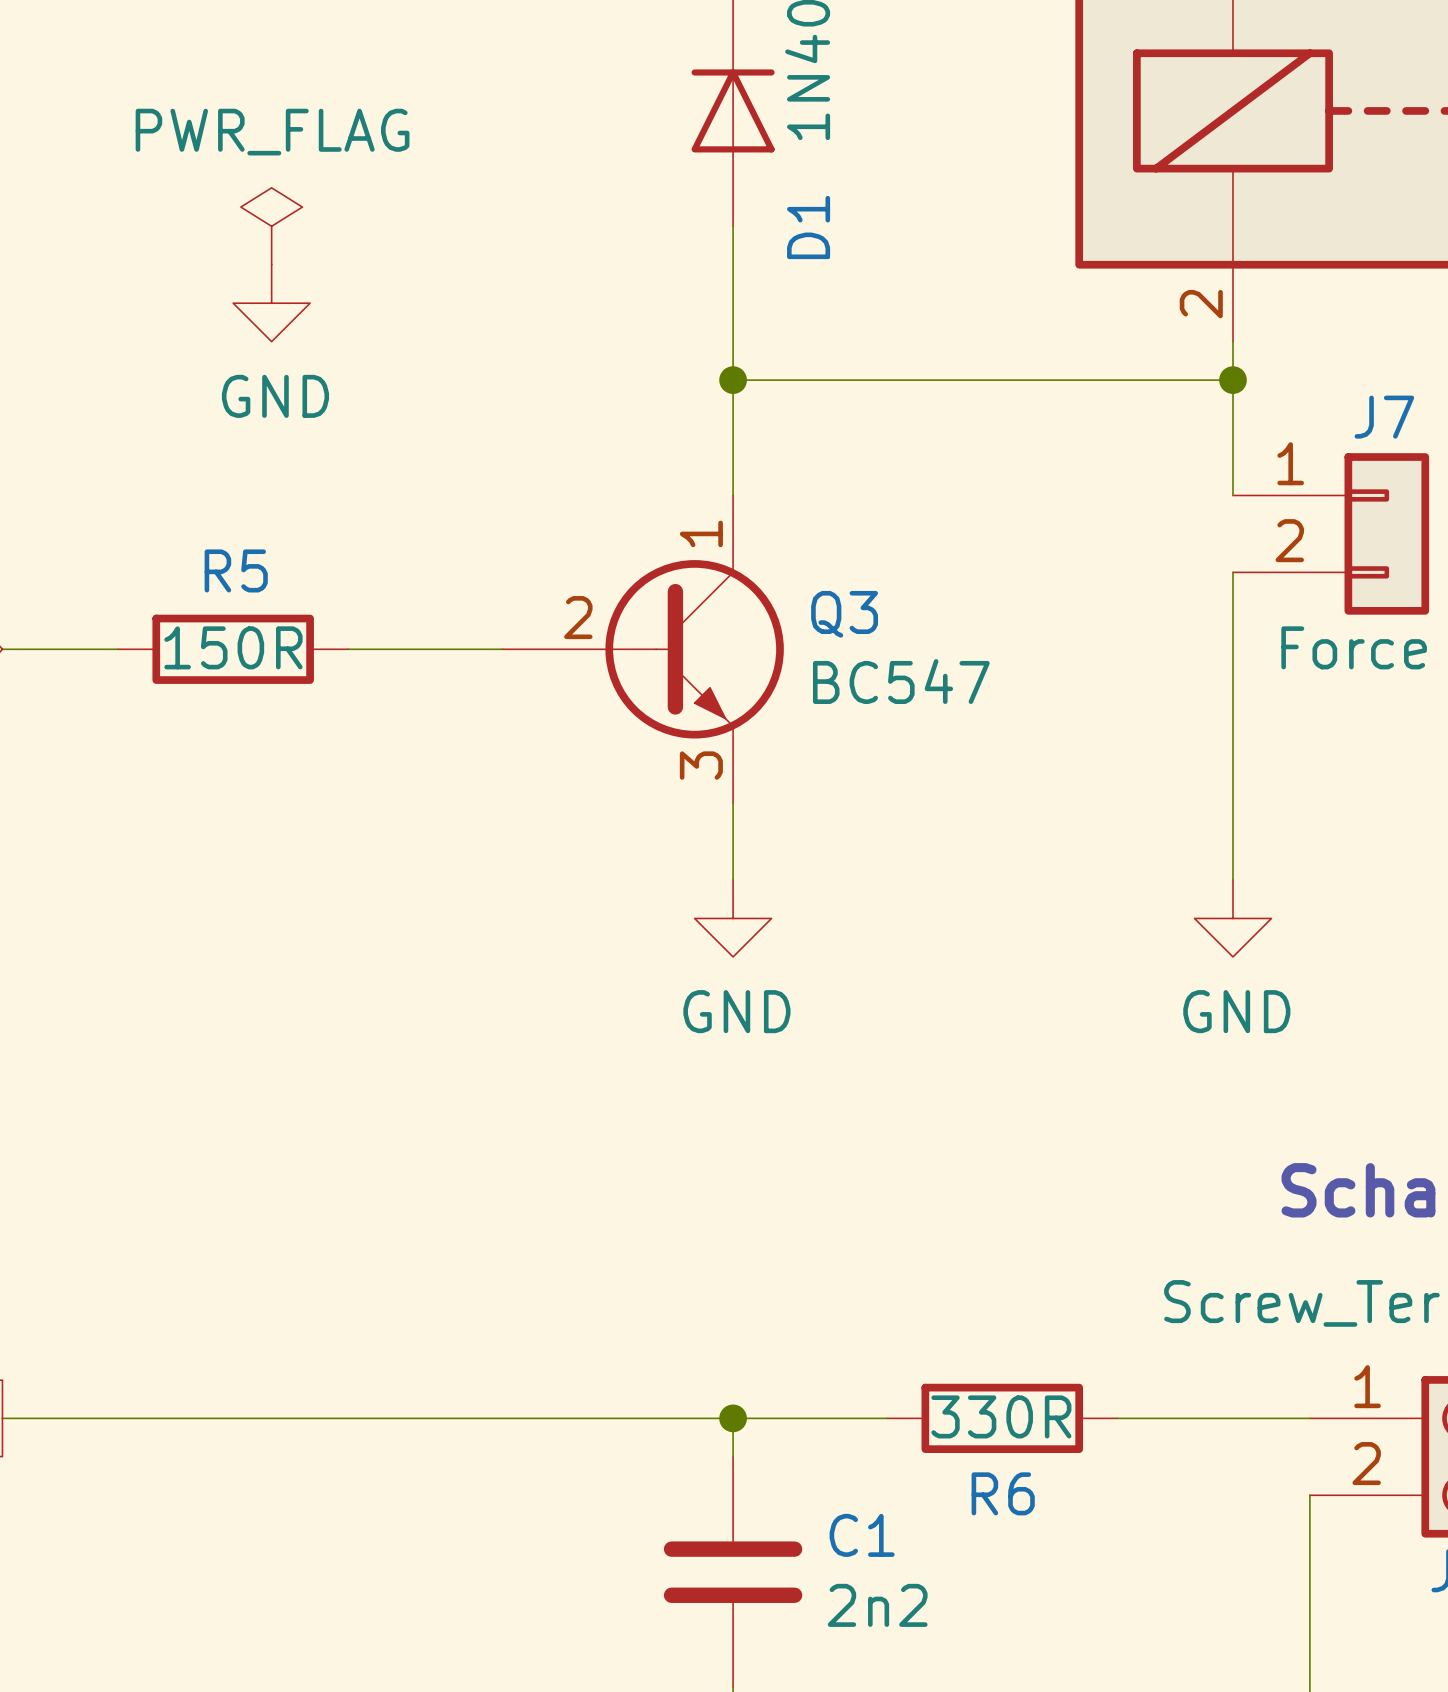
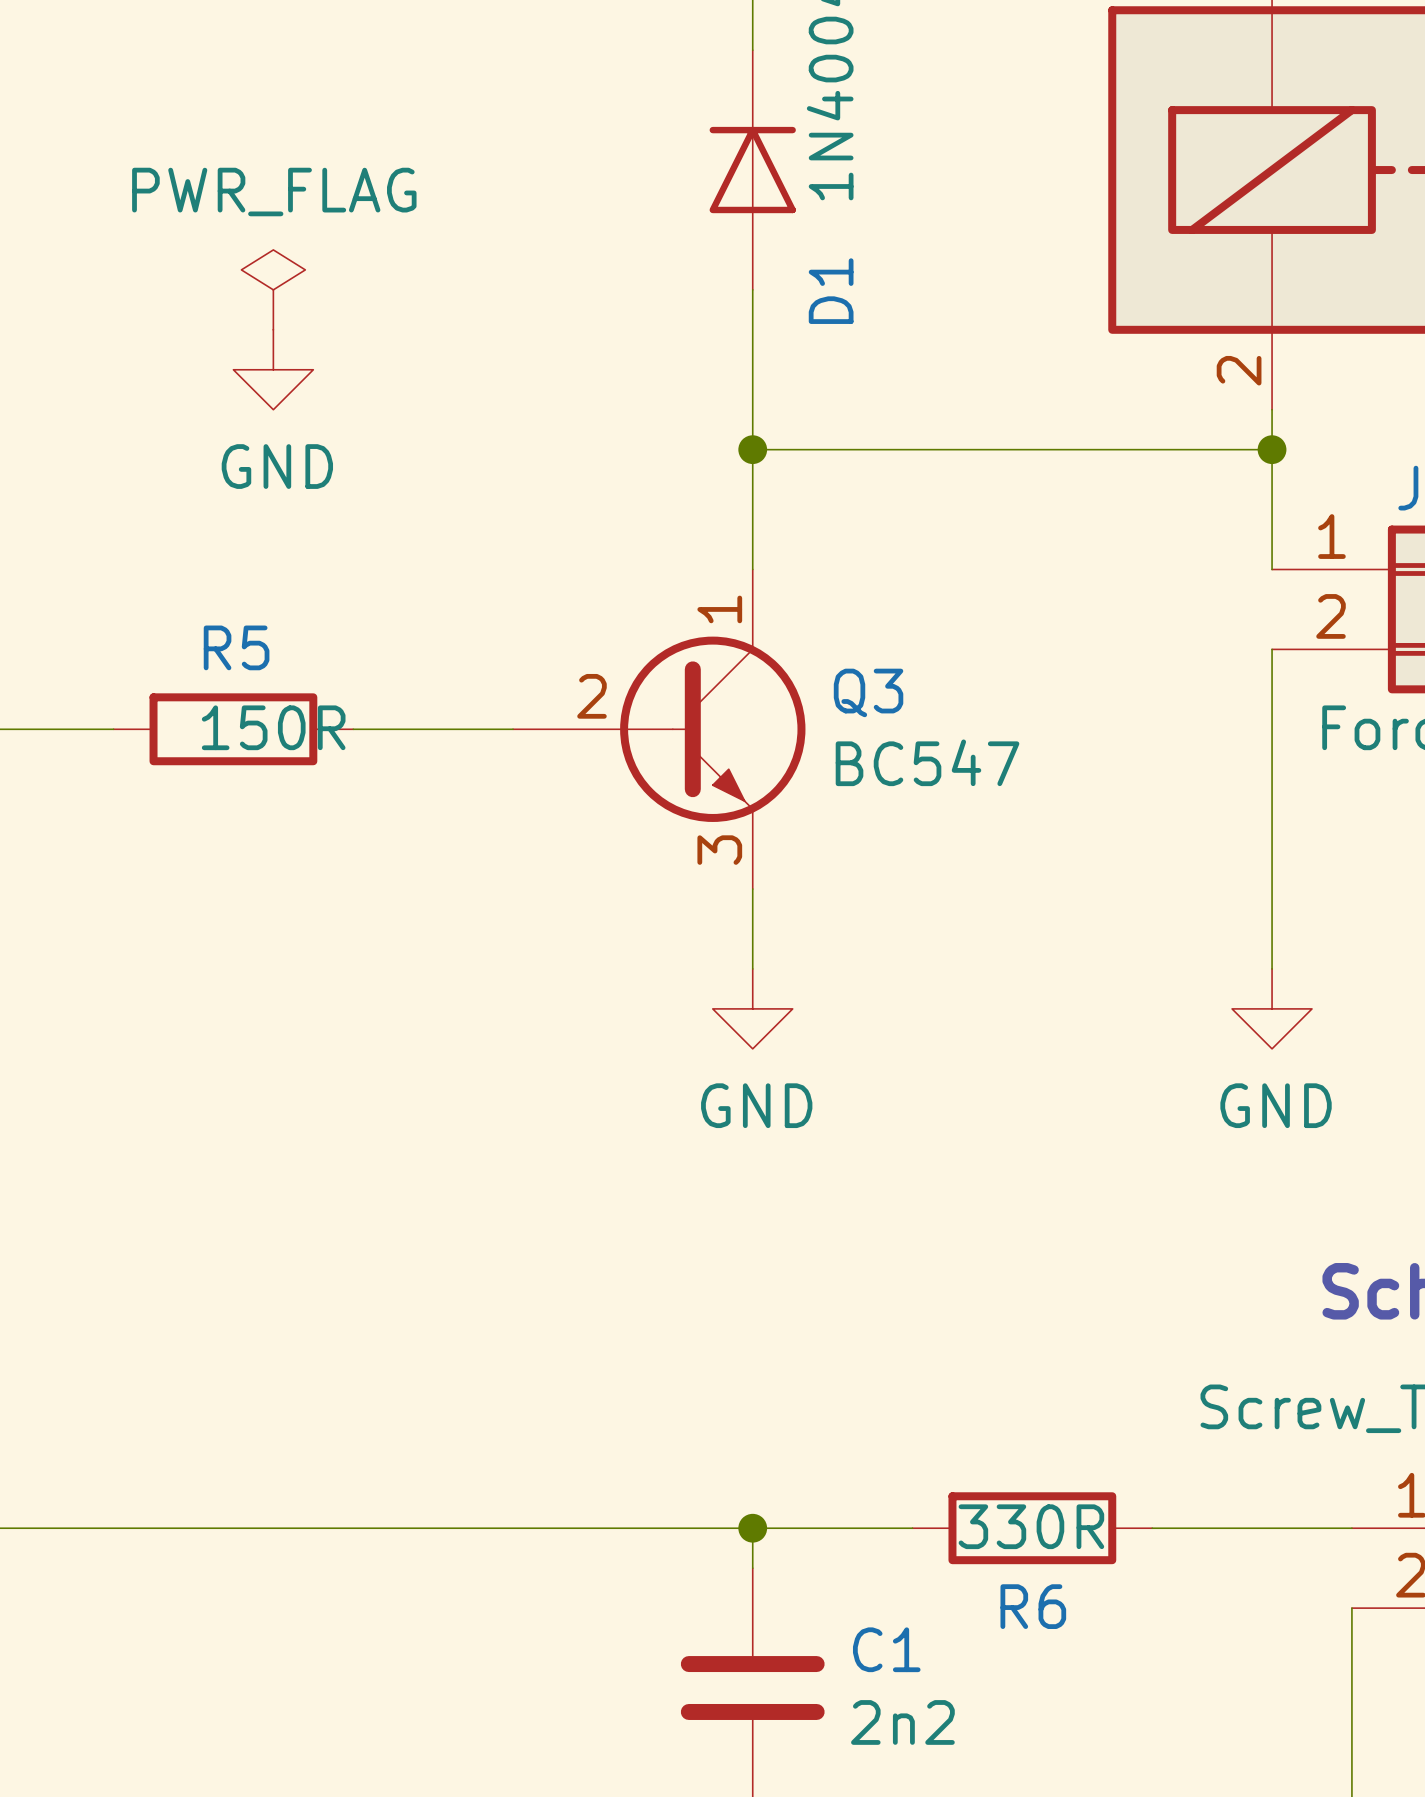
R5 value position: 150R (233, 647) -> 150R (273, 727)

